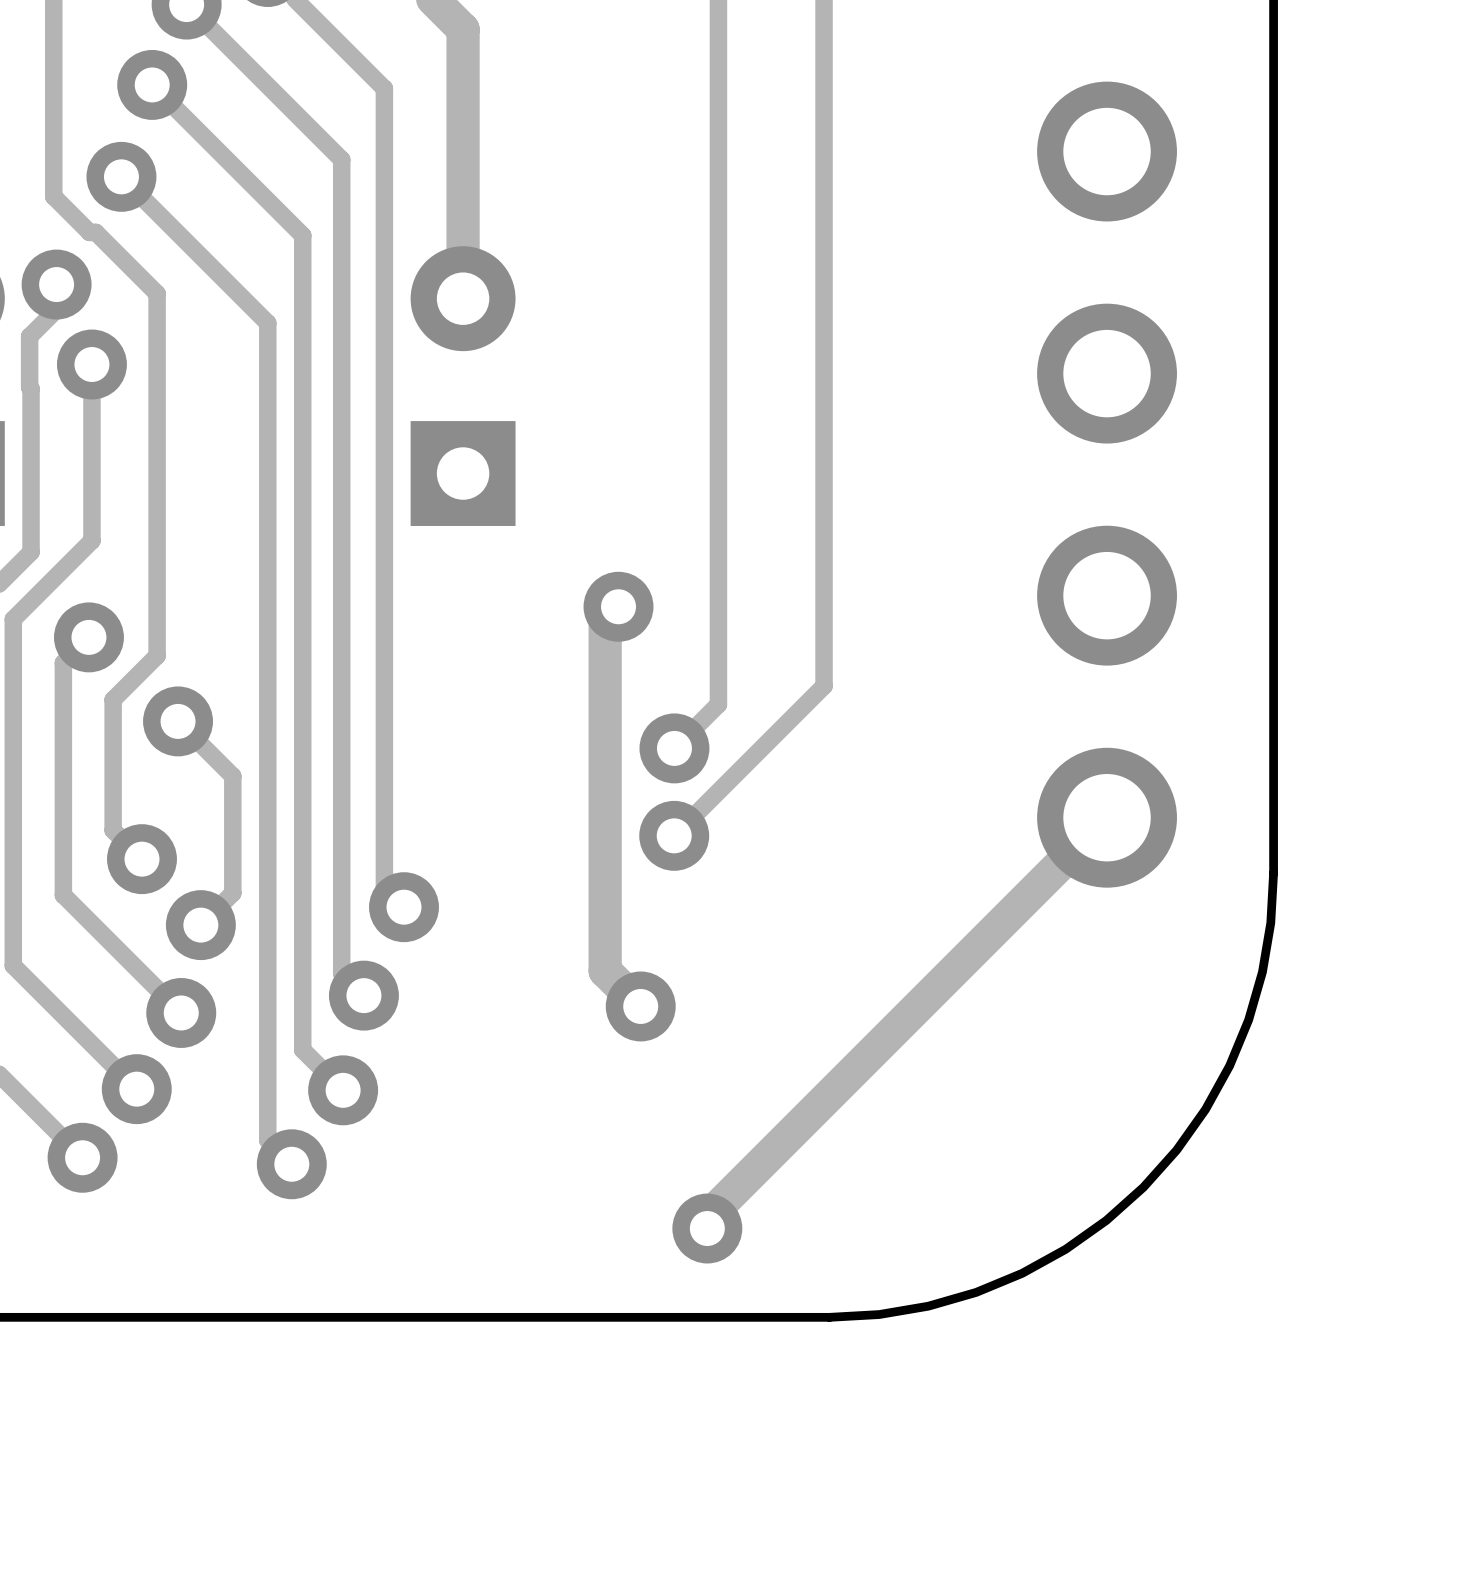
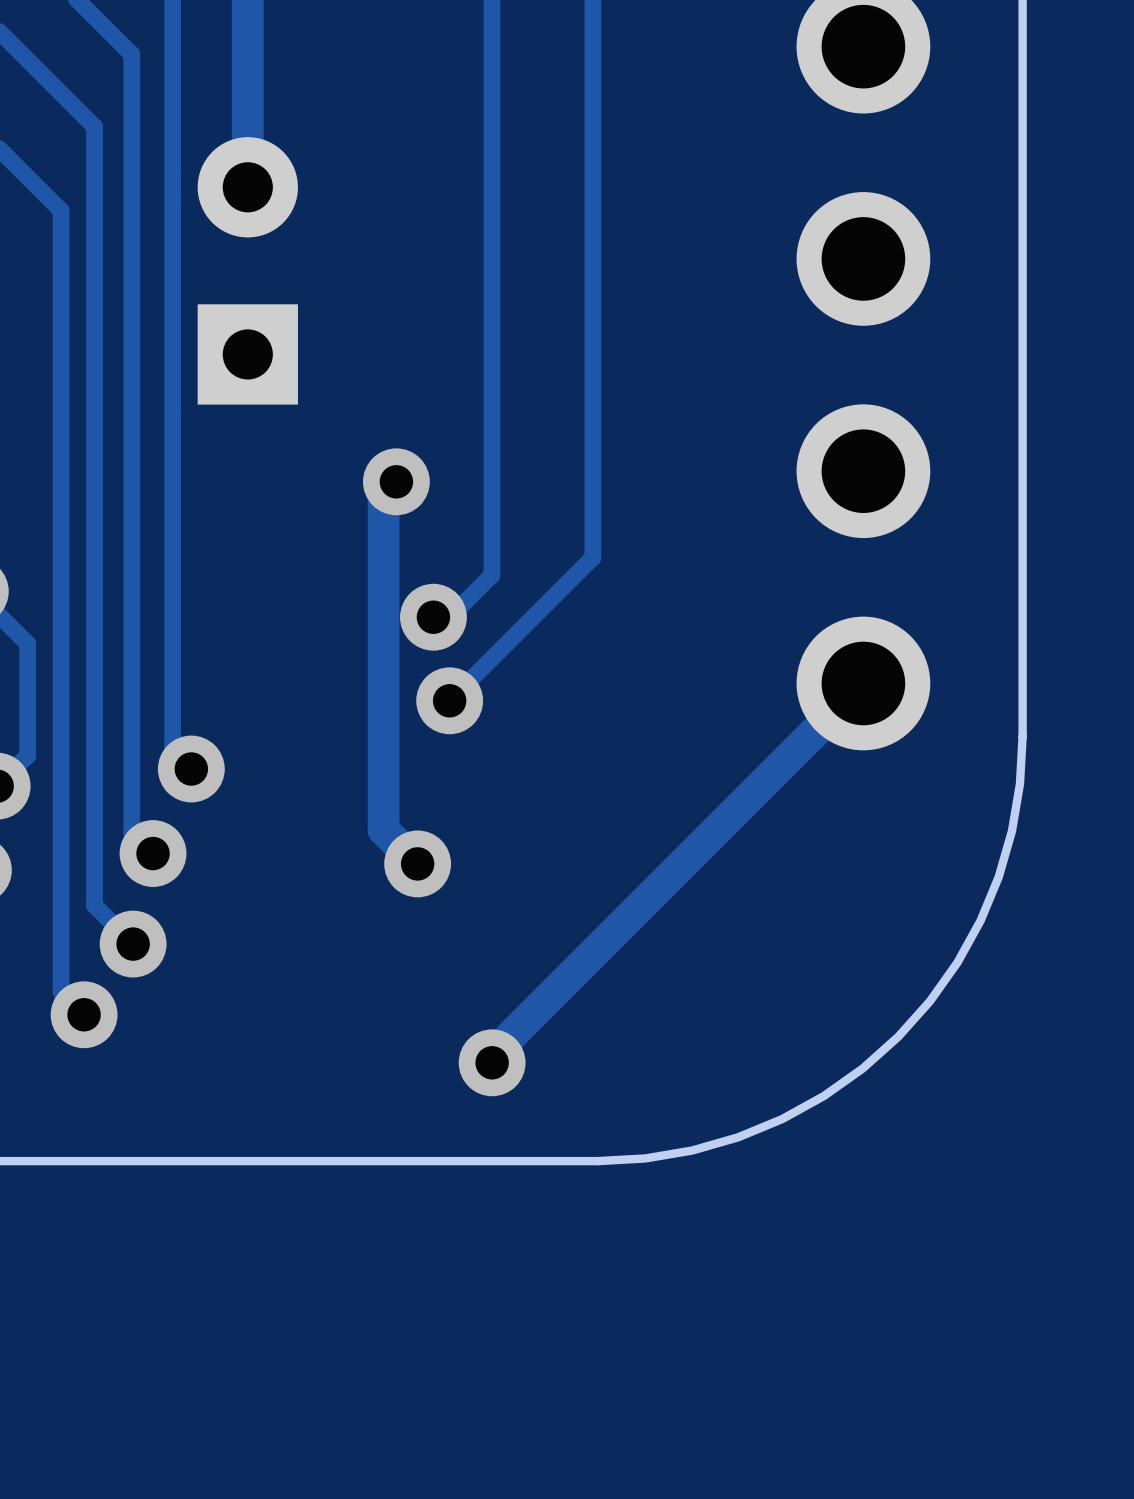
via position: (674, 748) -> (433, 617)
via position: (707, 1228) -> (492, 1062)

